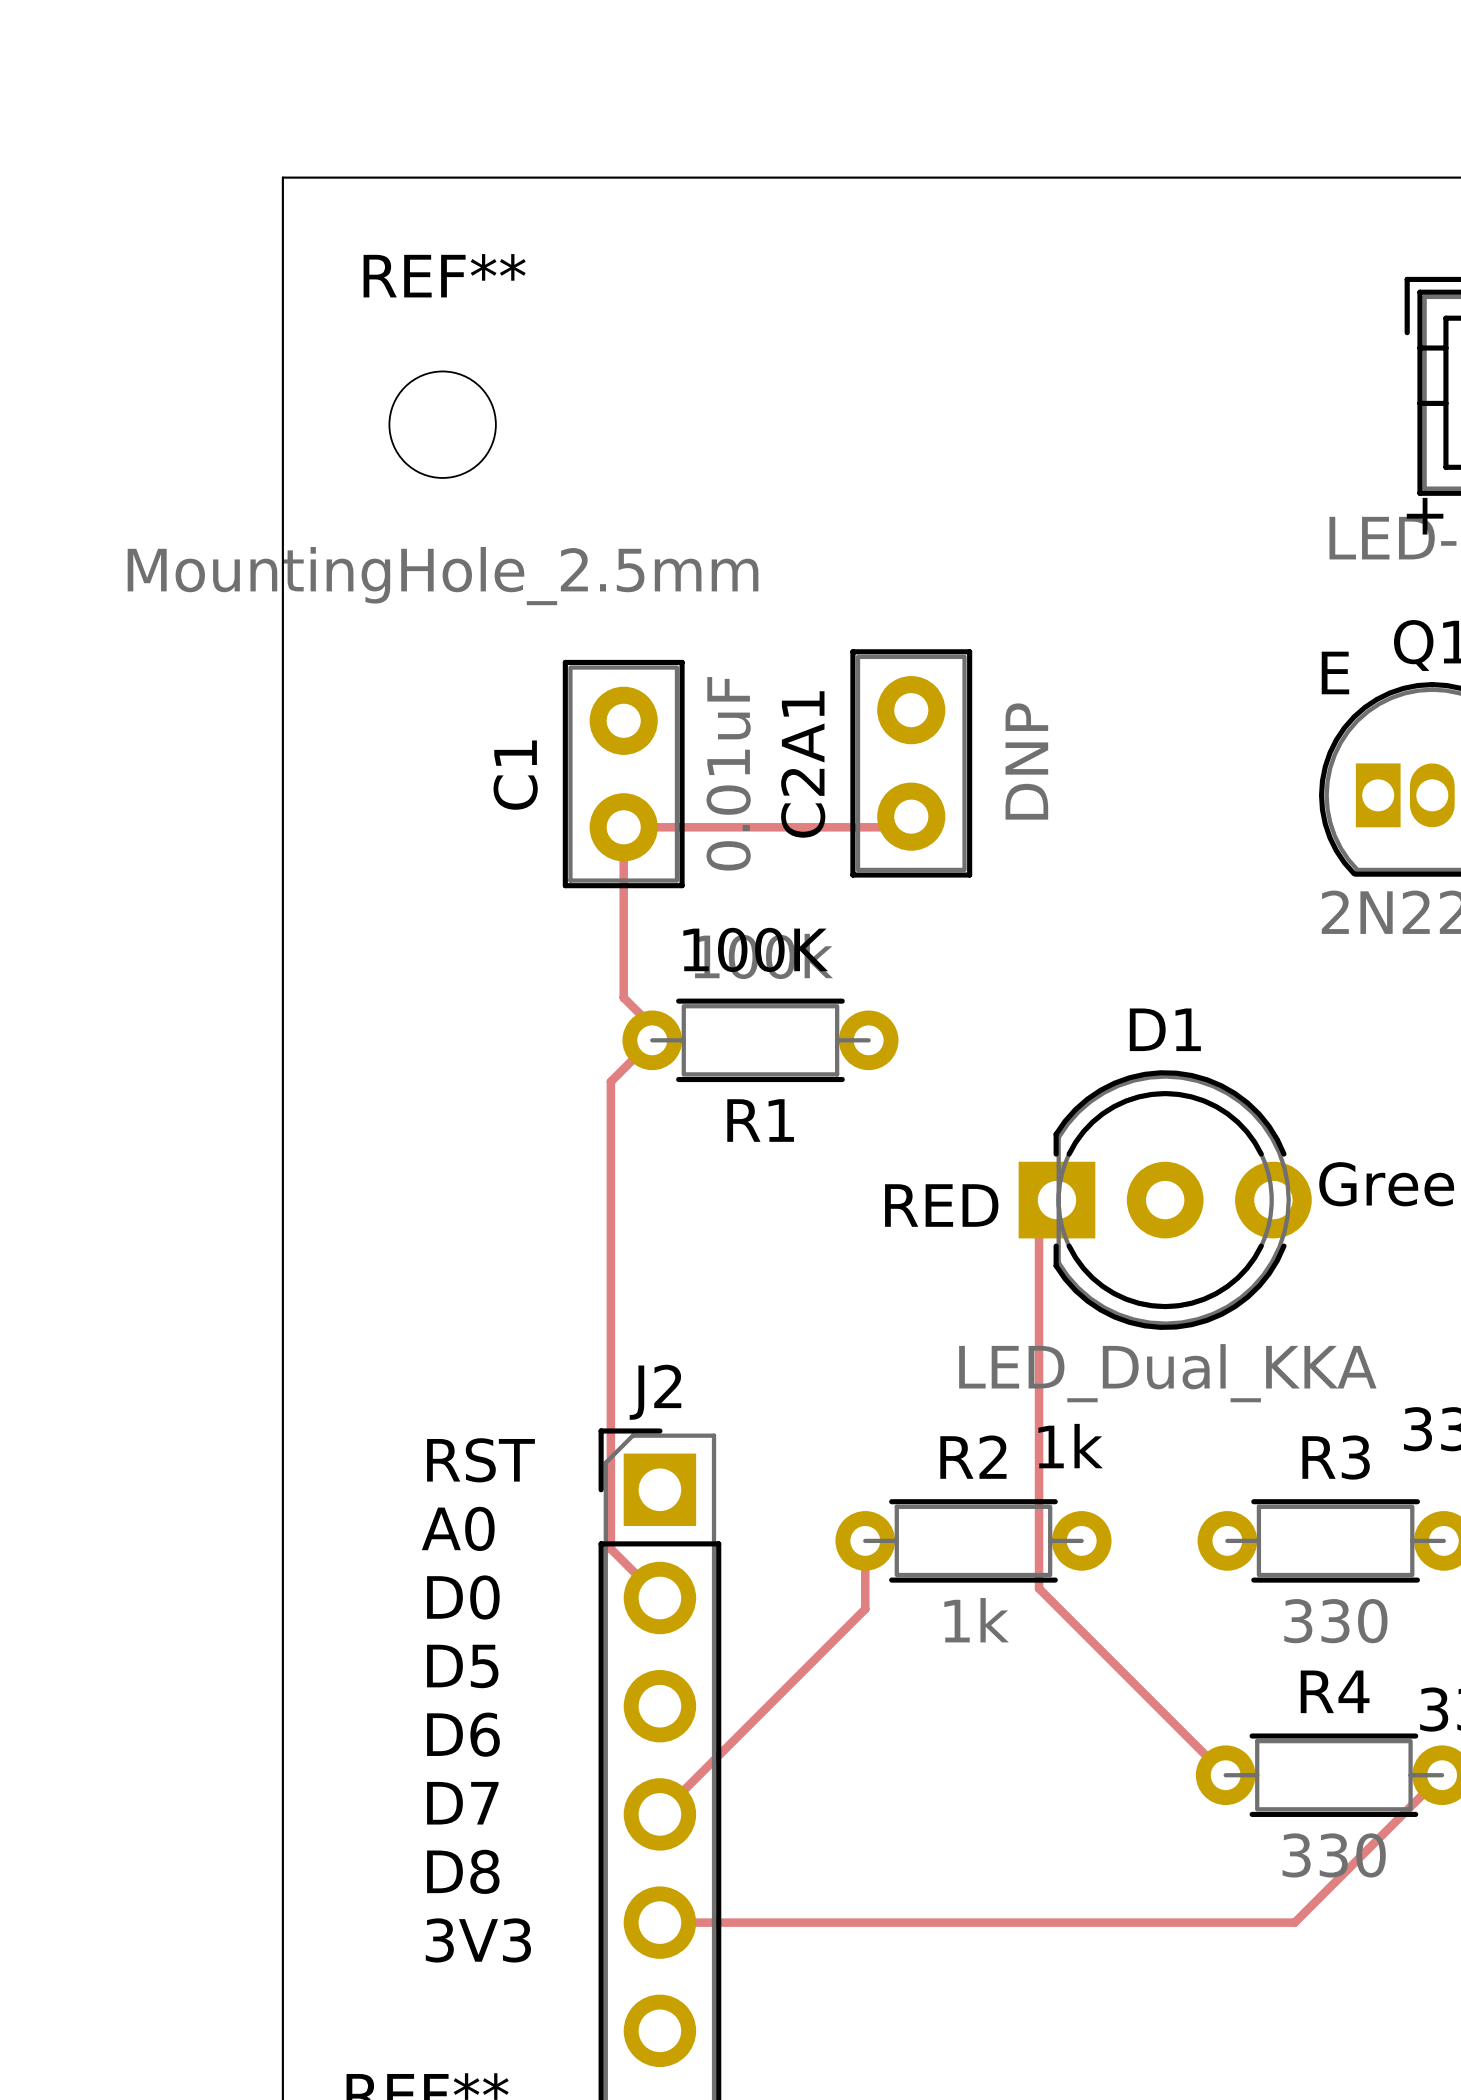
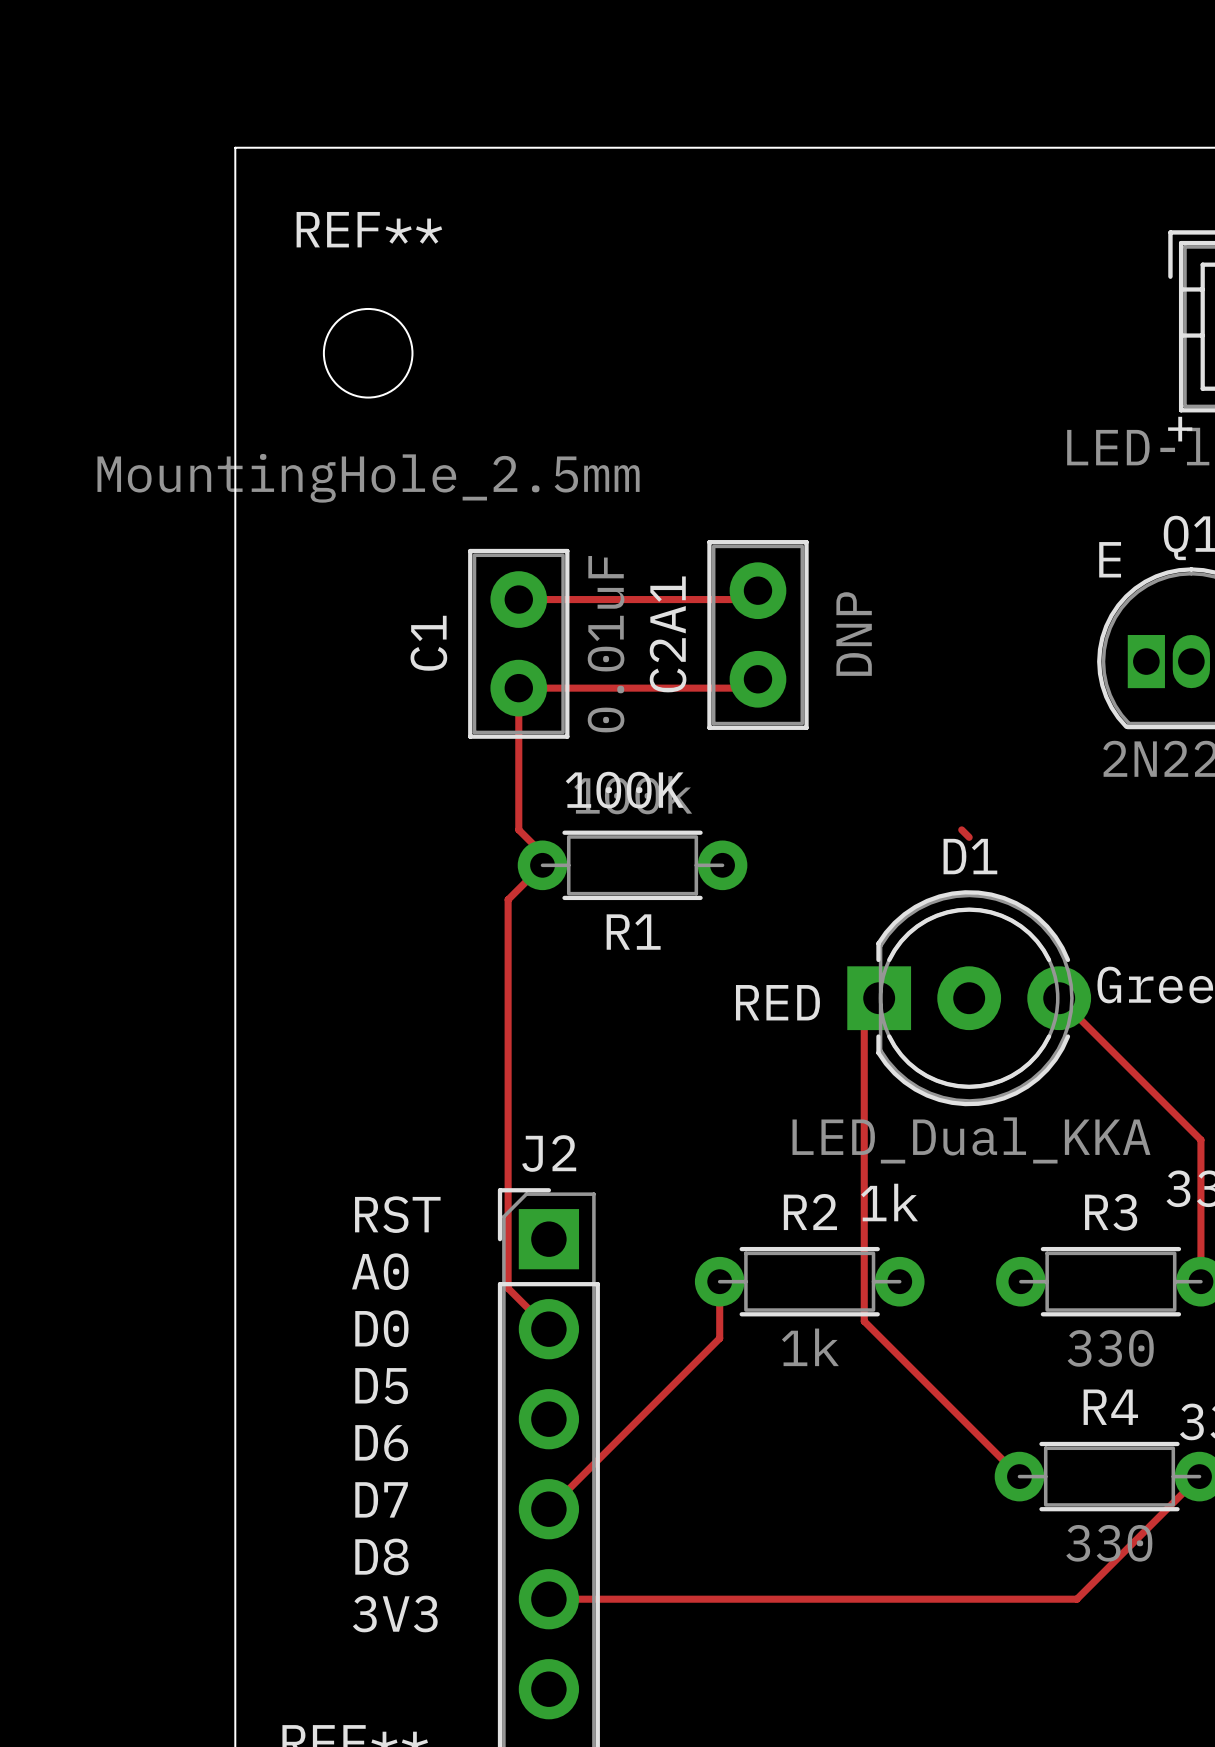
track: none -> (518, 599) (749, 599)
track: none -> (961, 829) (969, 837)
track: none -> (1059, 998) (1200, 1139) (1200, 1281)

